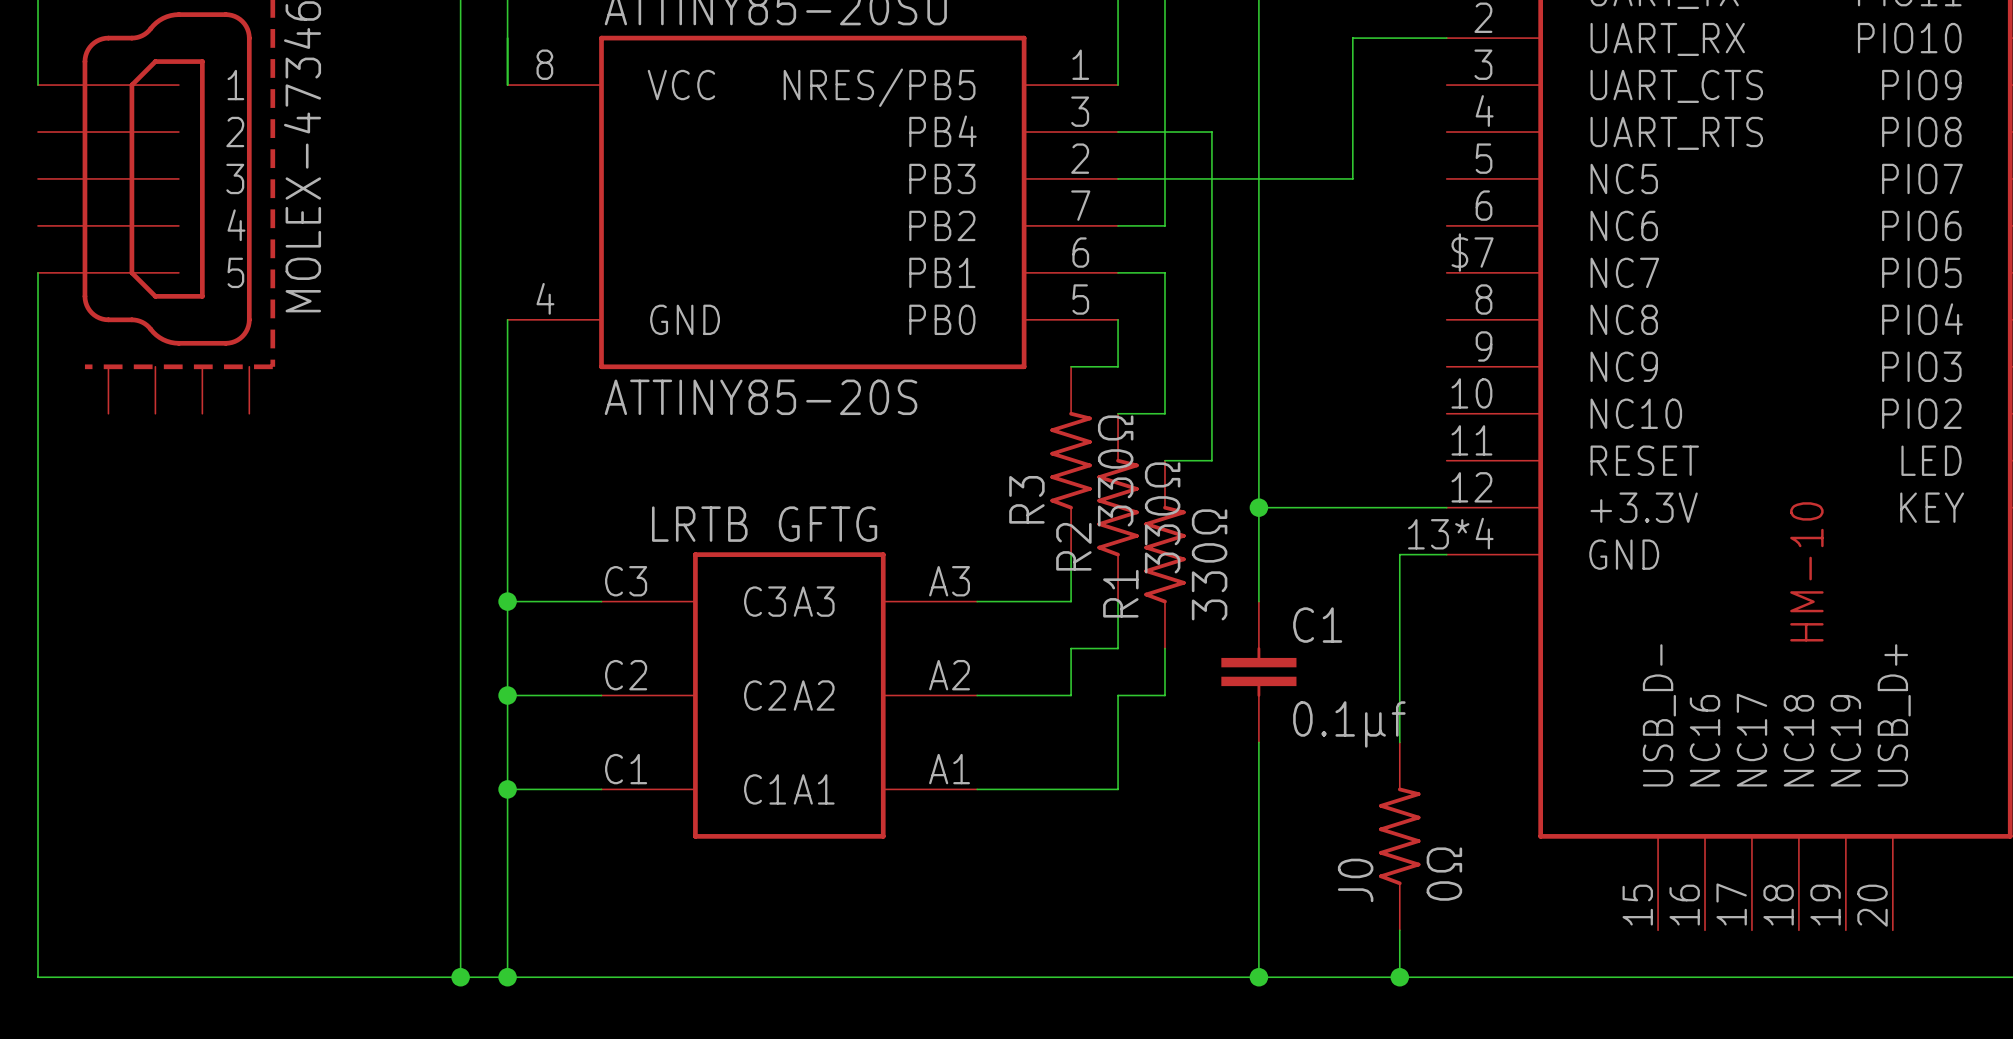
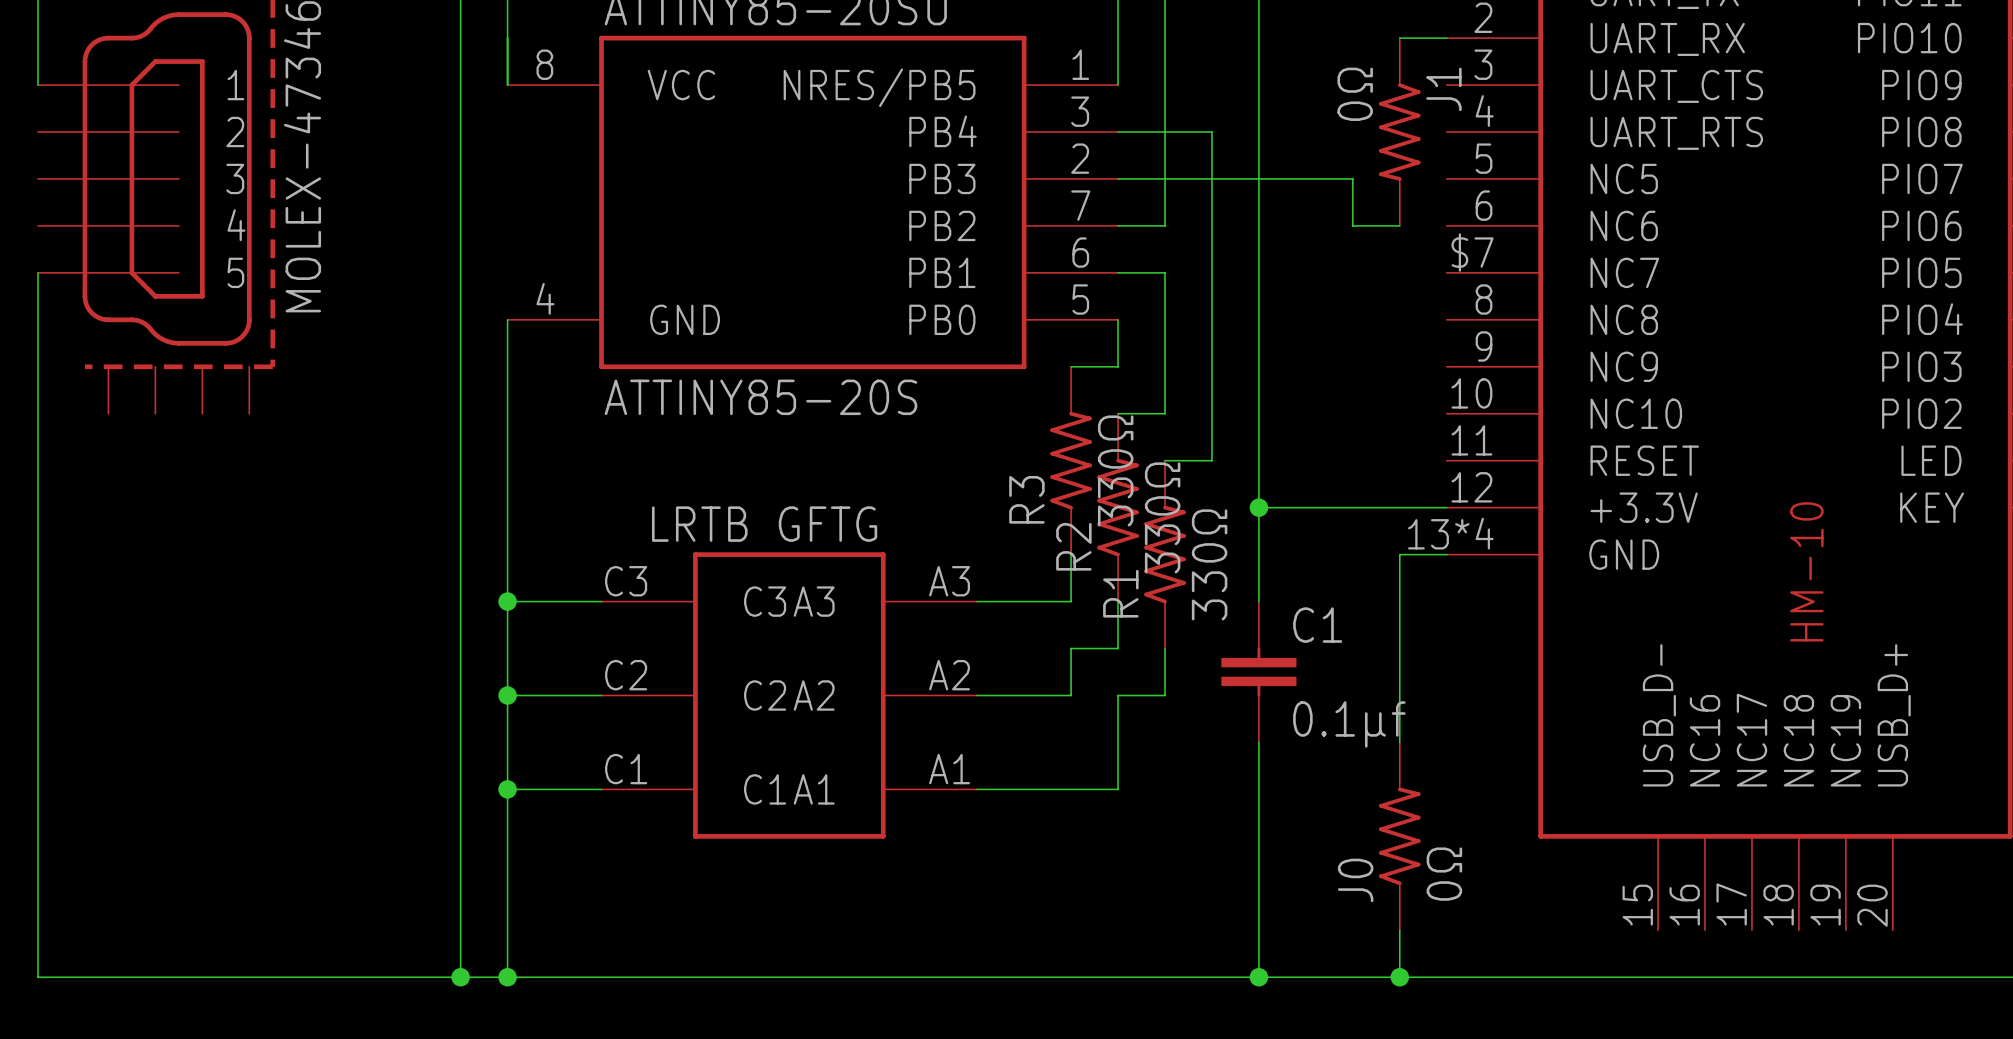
wire: (1399, 38) (1352, 38) (1352, 178) -> (1399, 225) (1352, 225) (1352, 178)
J1: none -> 0Ω (1399, 132)

